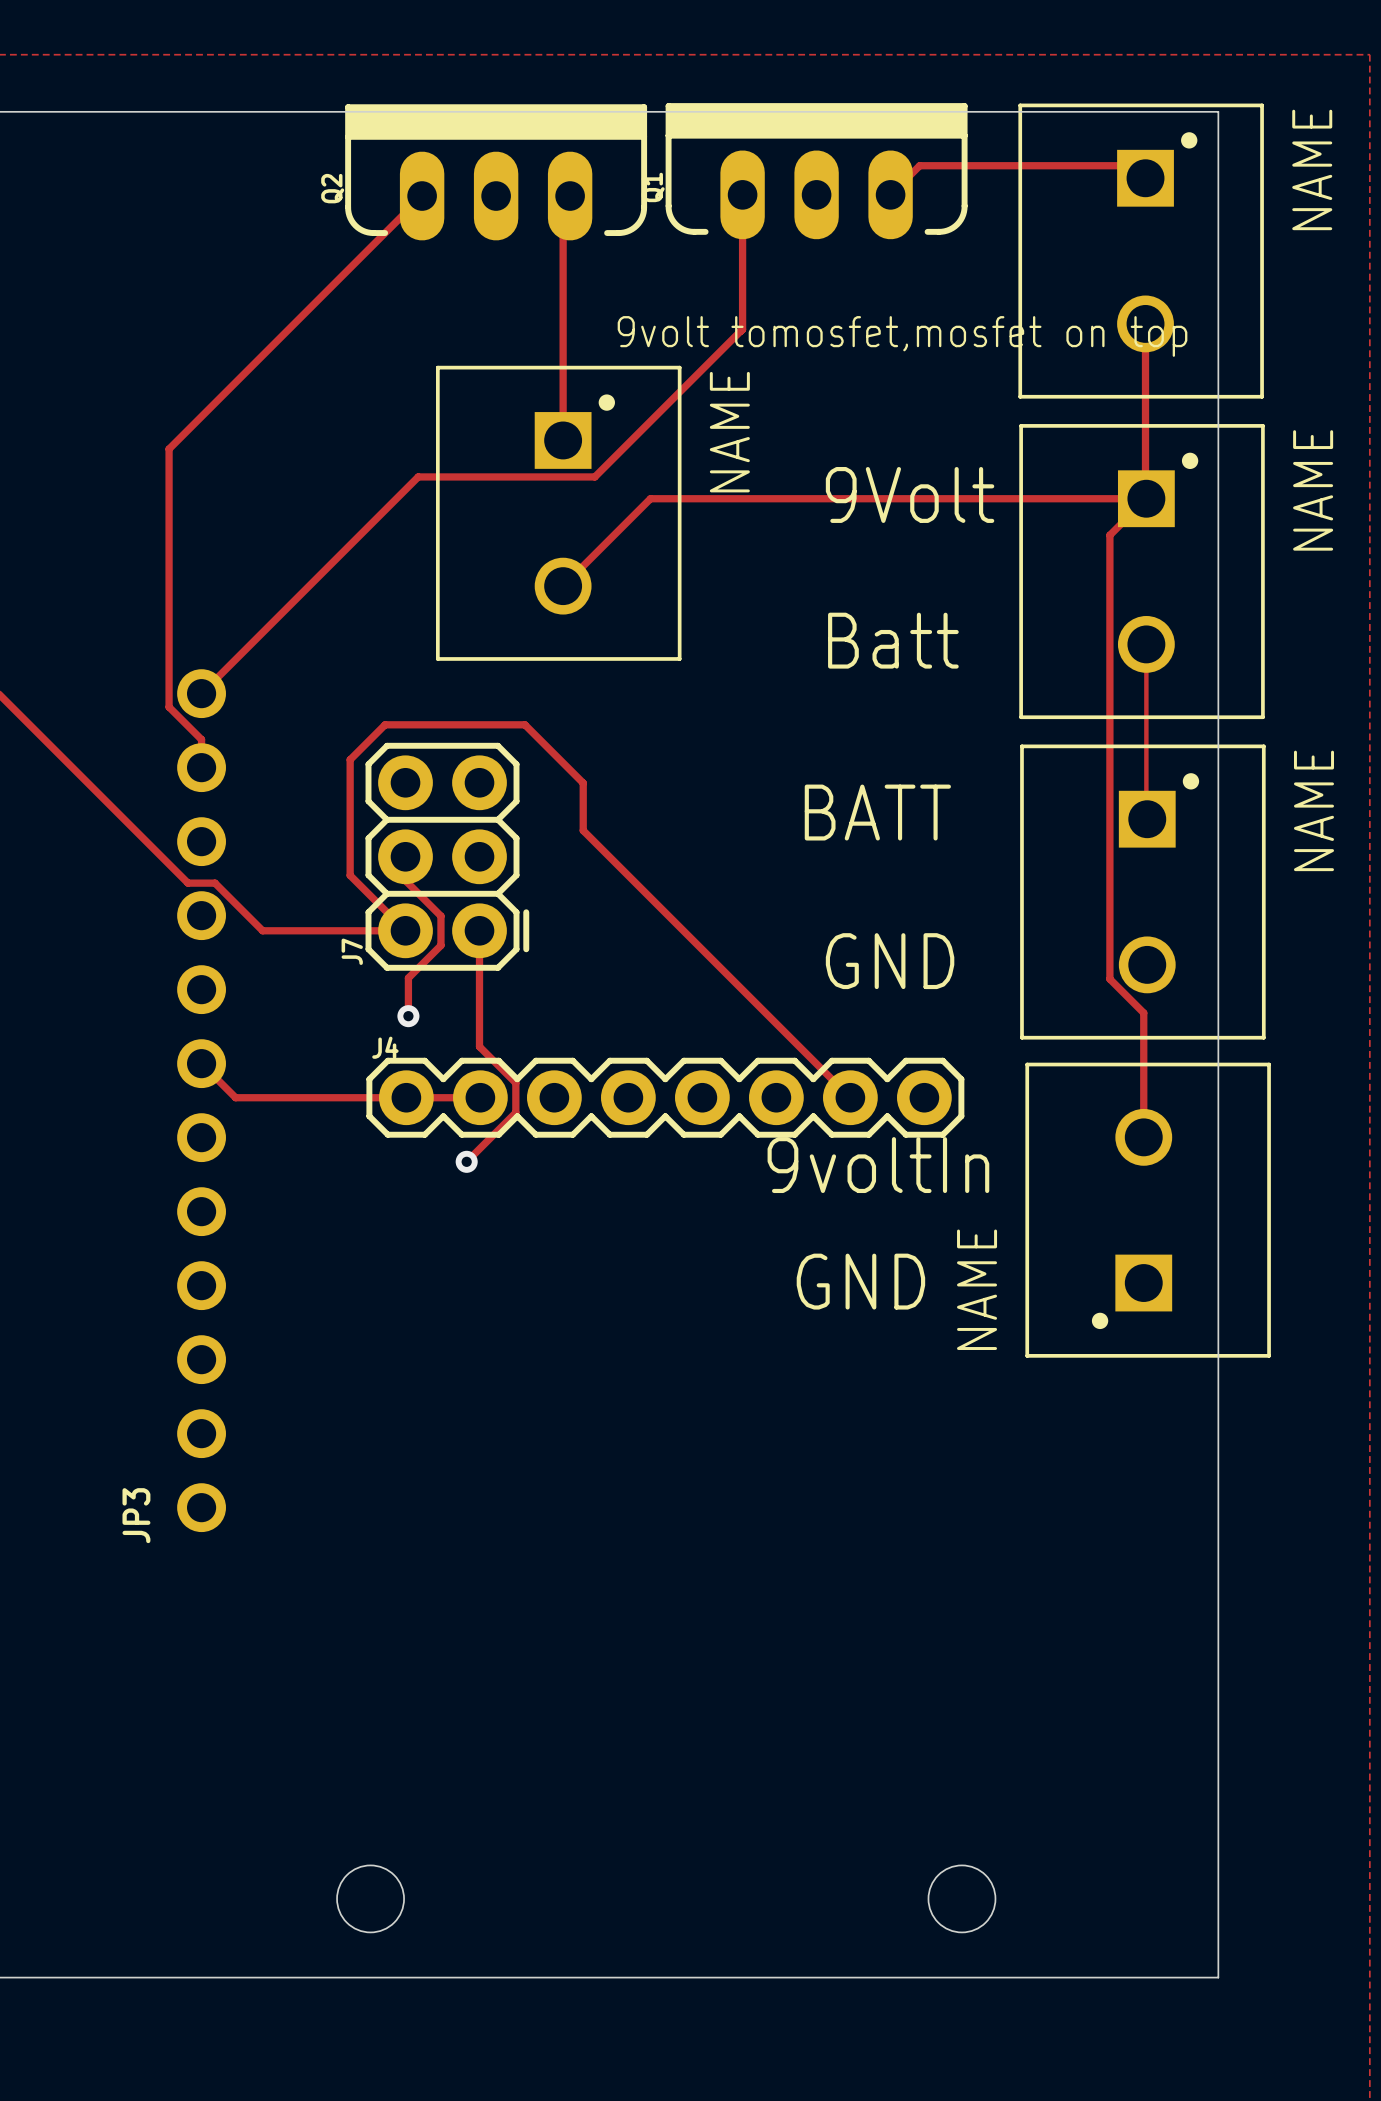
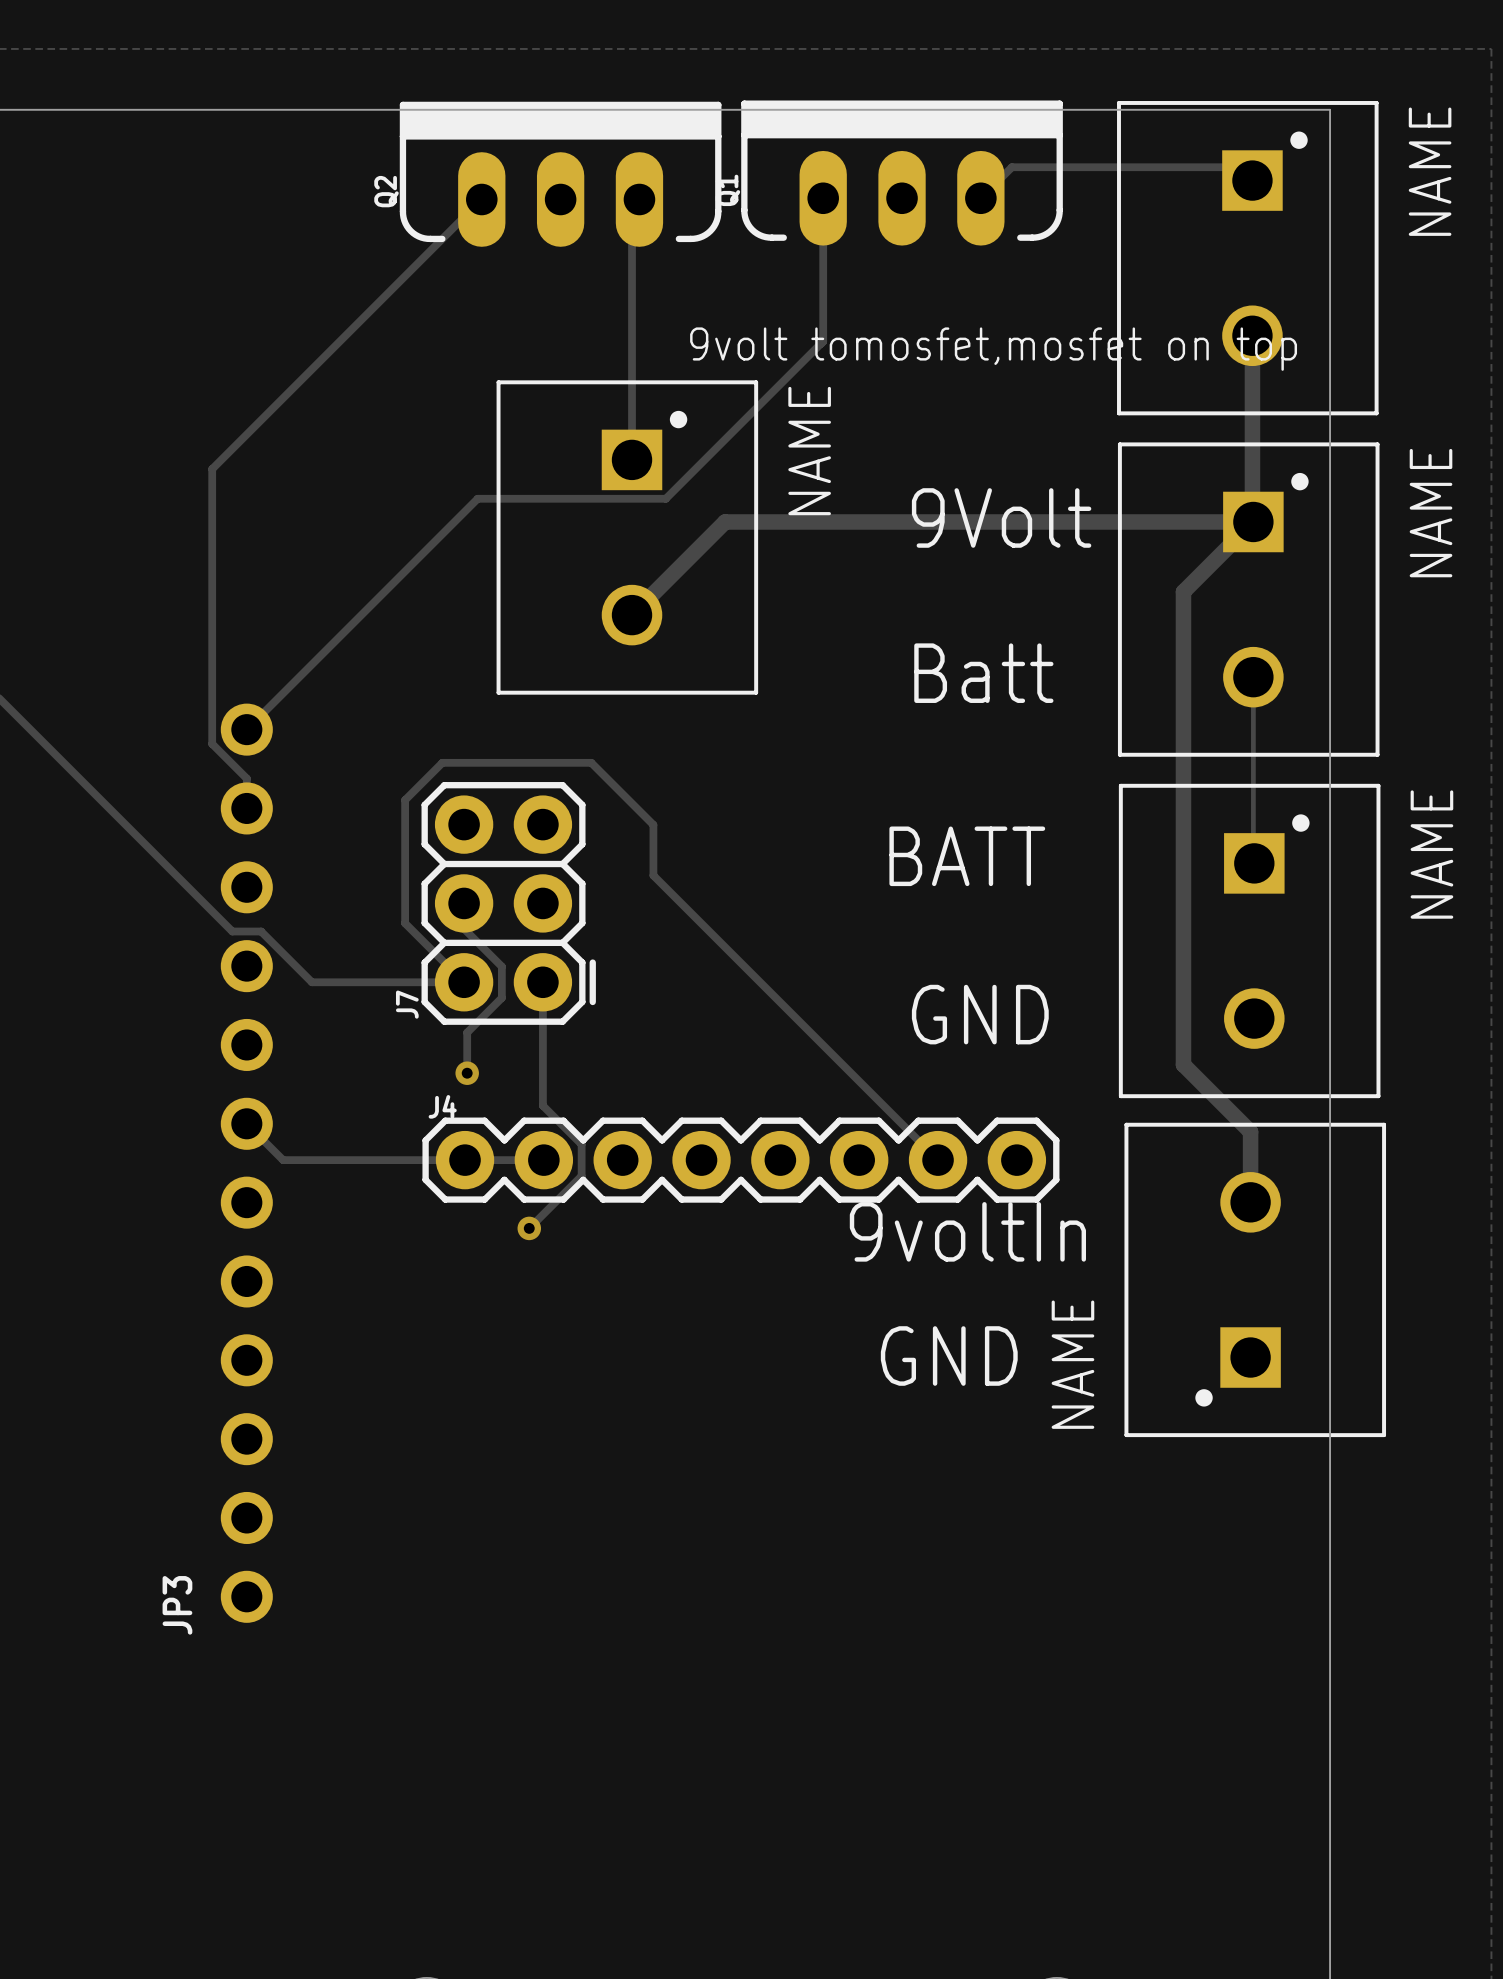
track width: thin (1145, 323) (1145, 497) -> thick (1252, 335) (1252, 521)
track: (1109, 535) (1109, 979) (1143, 1012) (1143, 1071) -> (1214, 560) (1183, 591) (1183, 1064) (1250, 1131)
track width: thin (1109, 535) (1146, 498) (650, 498) (563, 586) -> thick (1214, 560) (1253, 521) (725, 521) (632, 615)
track width: thin (1143, 1071) (1143, 1137) -> thick (1250, 1131) (1250, 1202)

